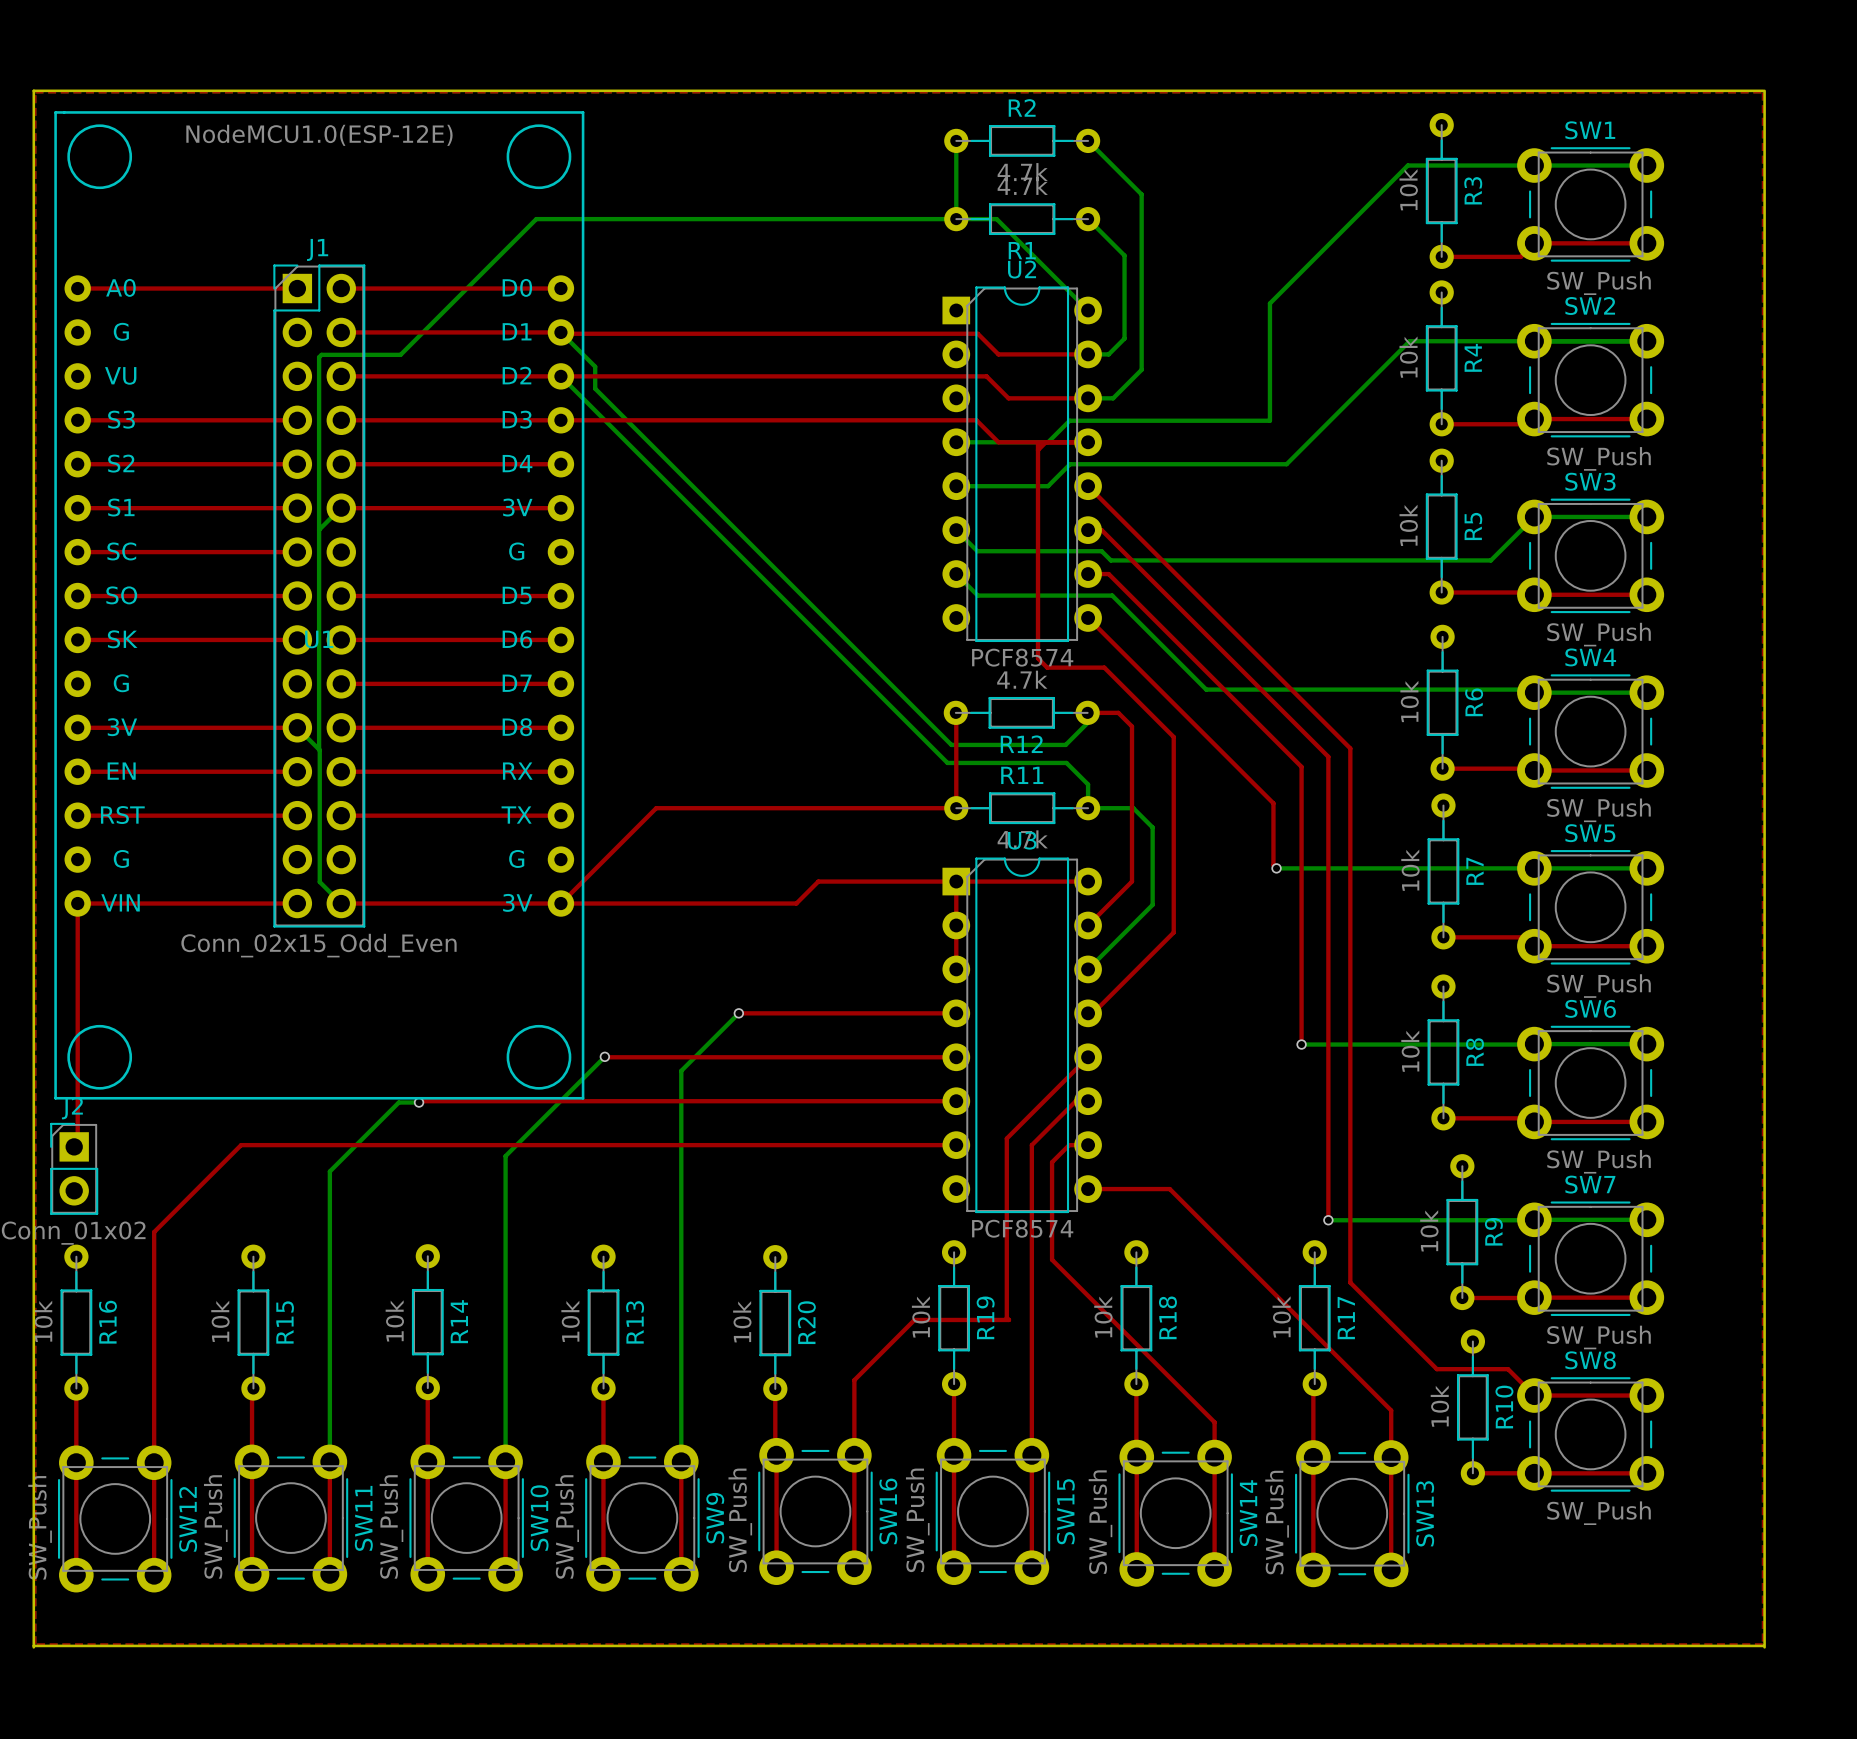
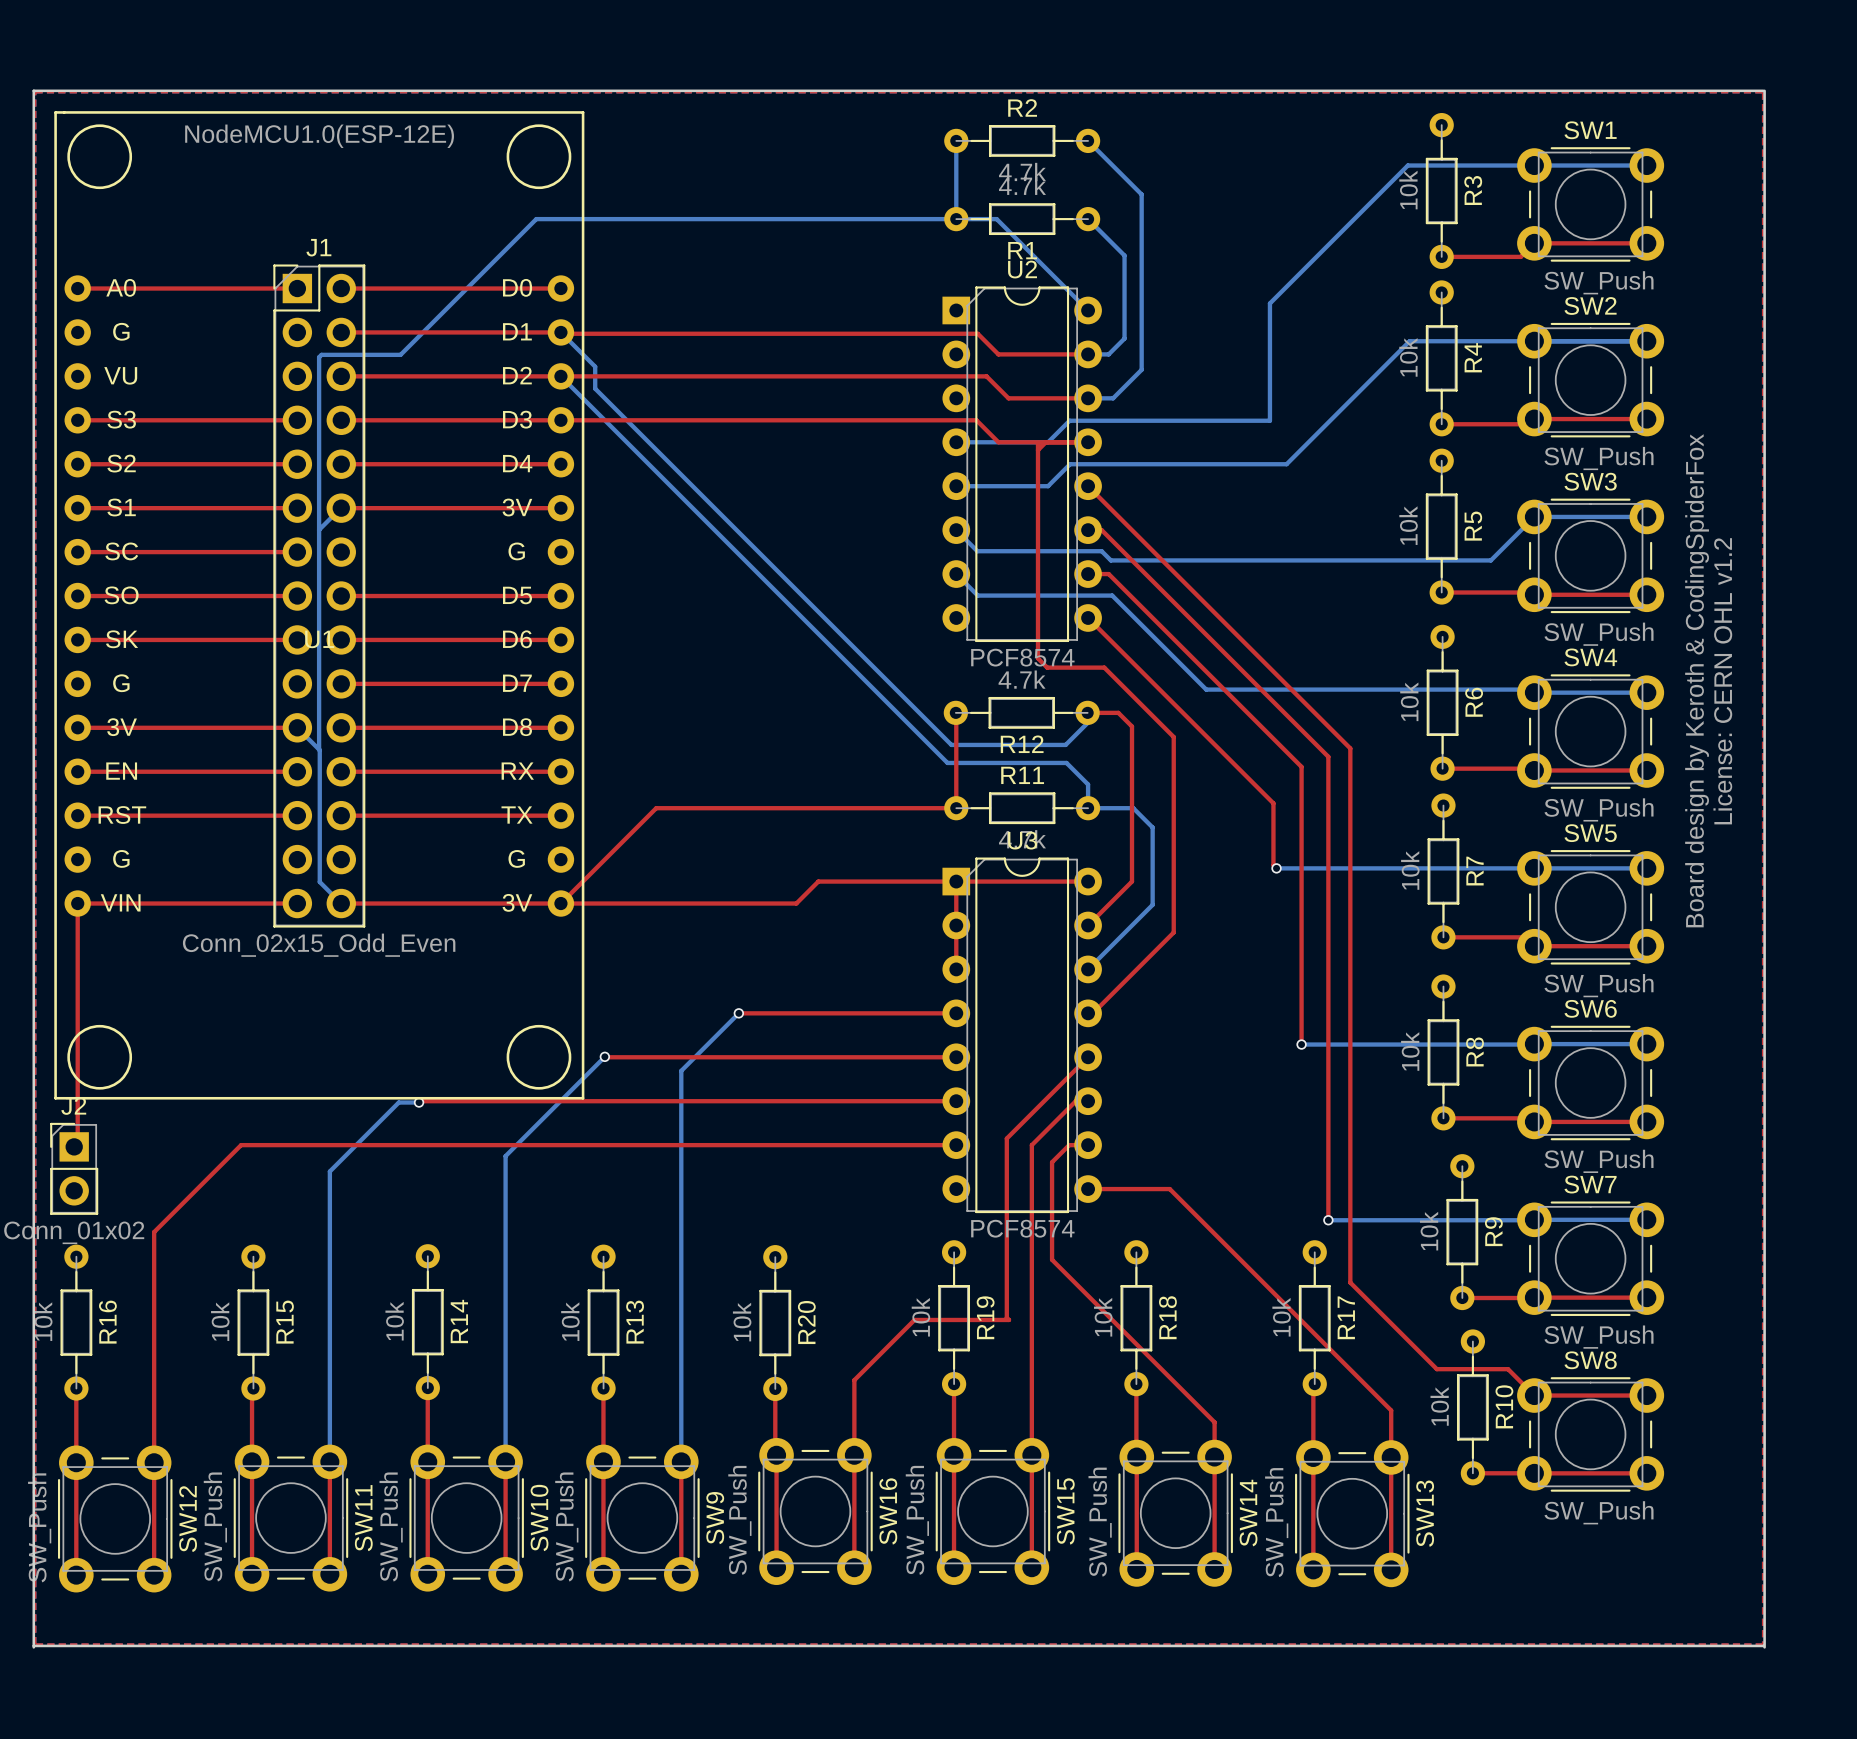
text: none -> Board design by Keroth & CodingSpiderFox (1697, 680)
text: none -> License: CERN OHL v1.2 (1722, 681)

